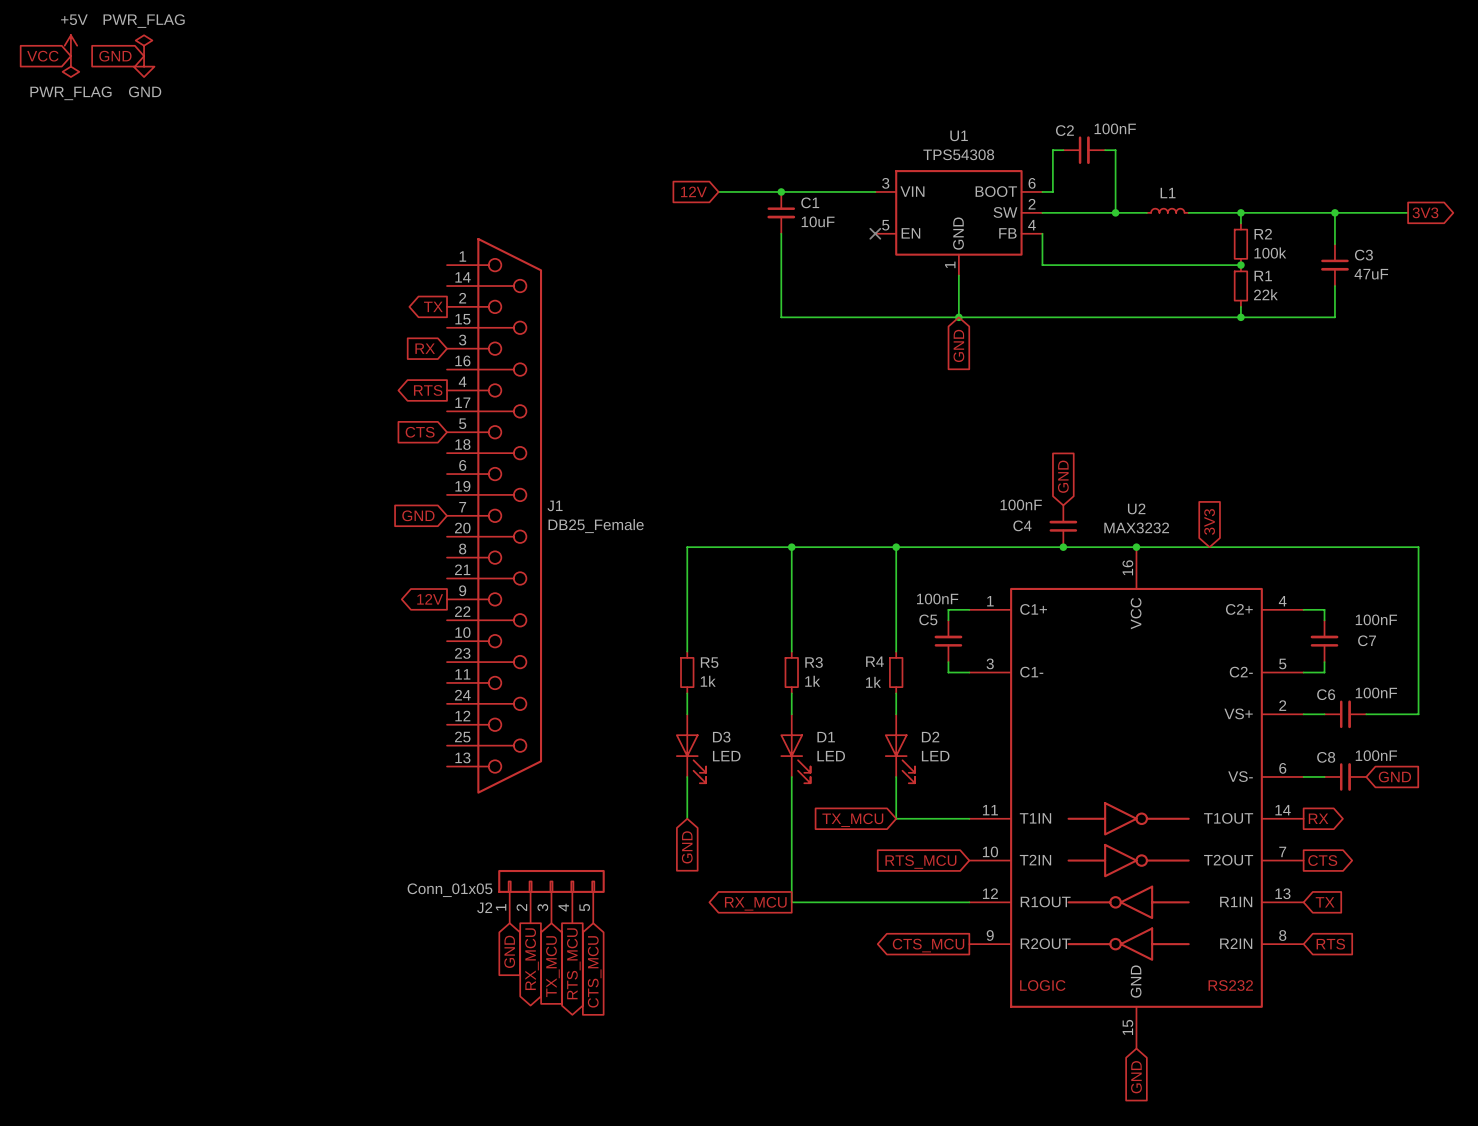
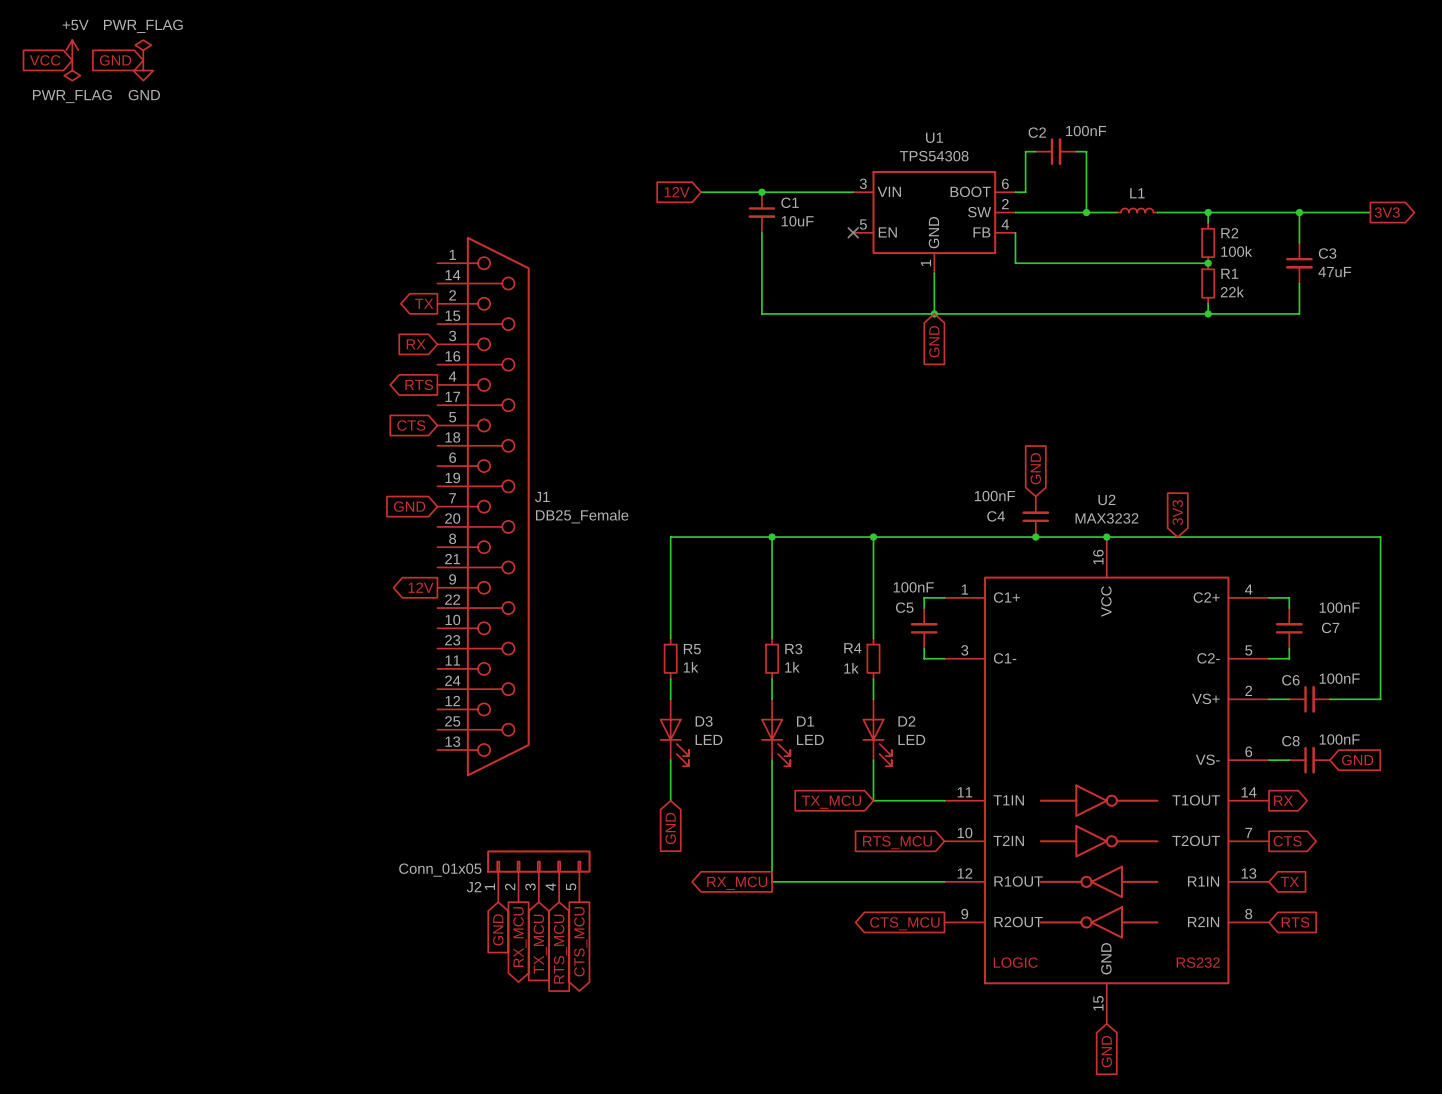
global label shape: output (573, 963) -> input (560, 949)
global label shape: input (594, 971) -> output (580, 941)

